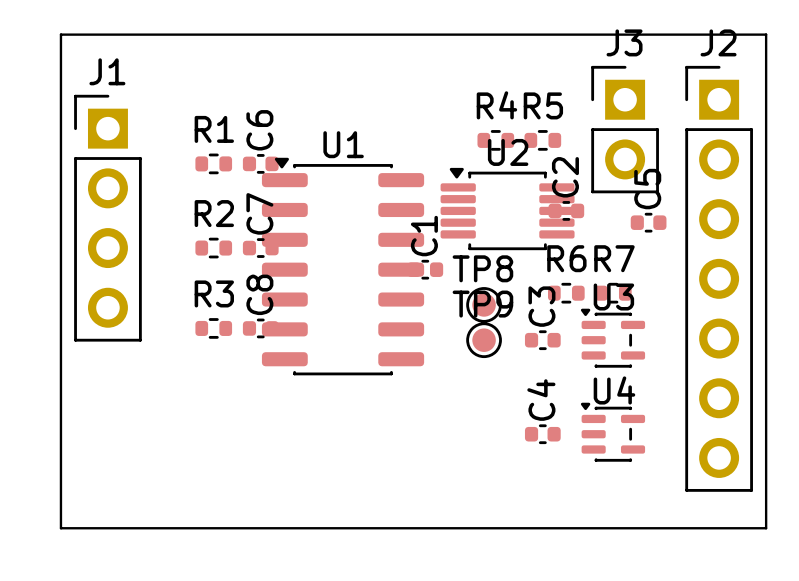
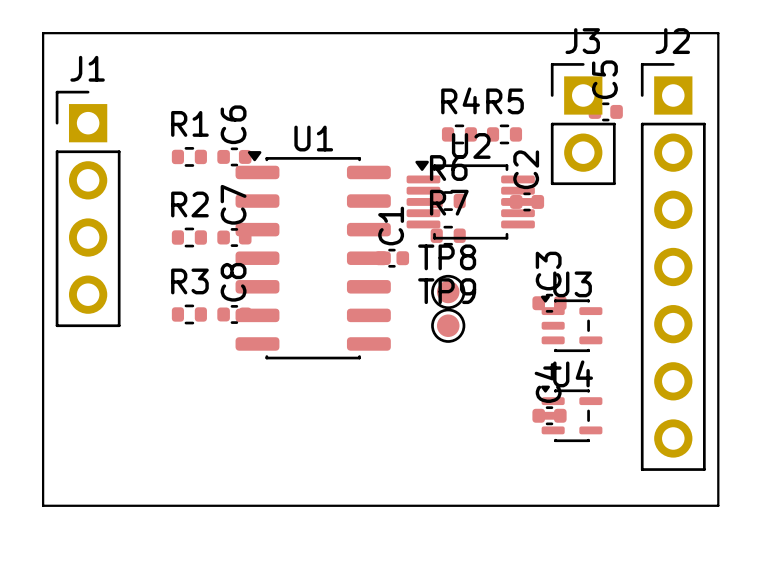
C5 position: (648, 222) -> (605, 111)
R6 position: (566, 293) -> (448, 201)
R7 position: (613, 293) -> (448, 235)
C3 position: (542, 340) -> (549, 303)
C4 position: (542, 434) -> (549, 415)

